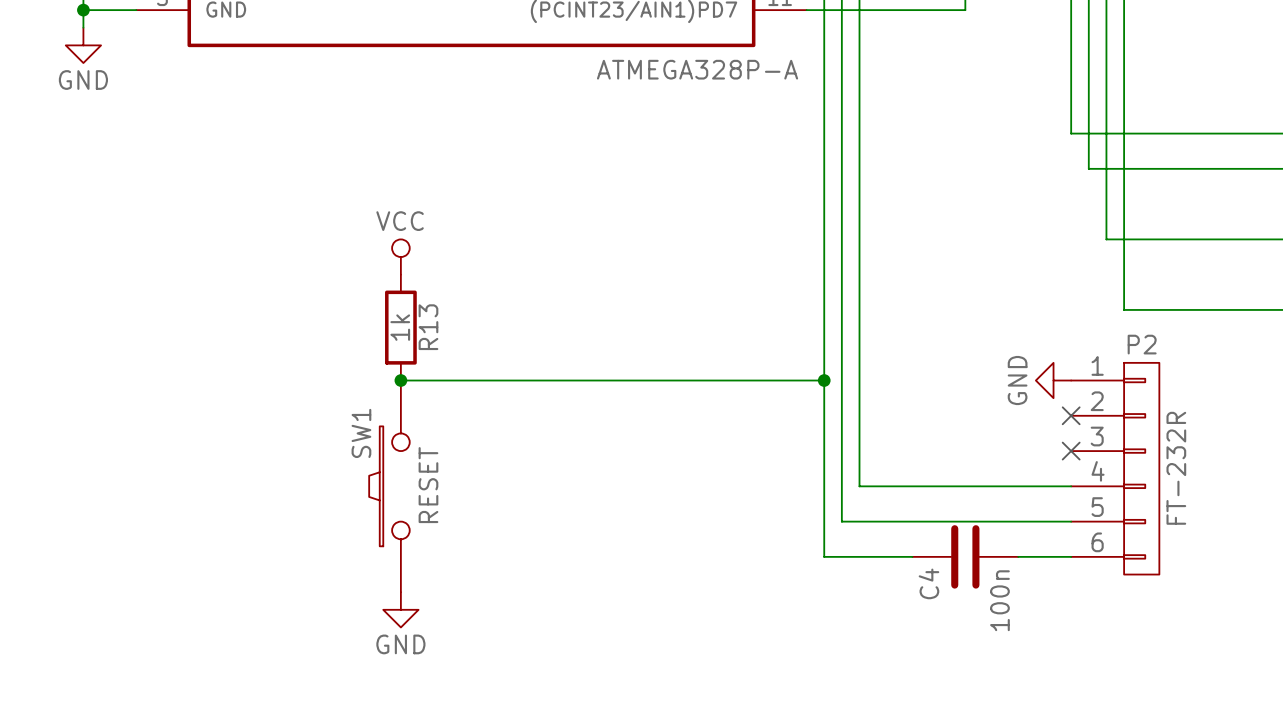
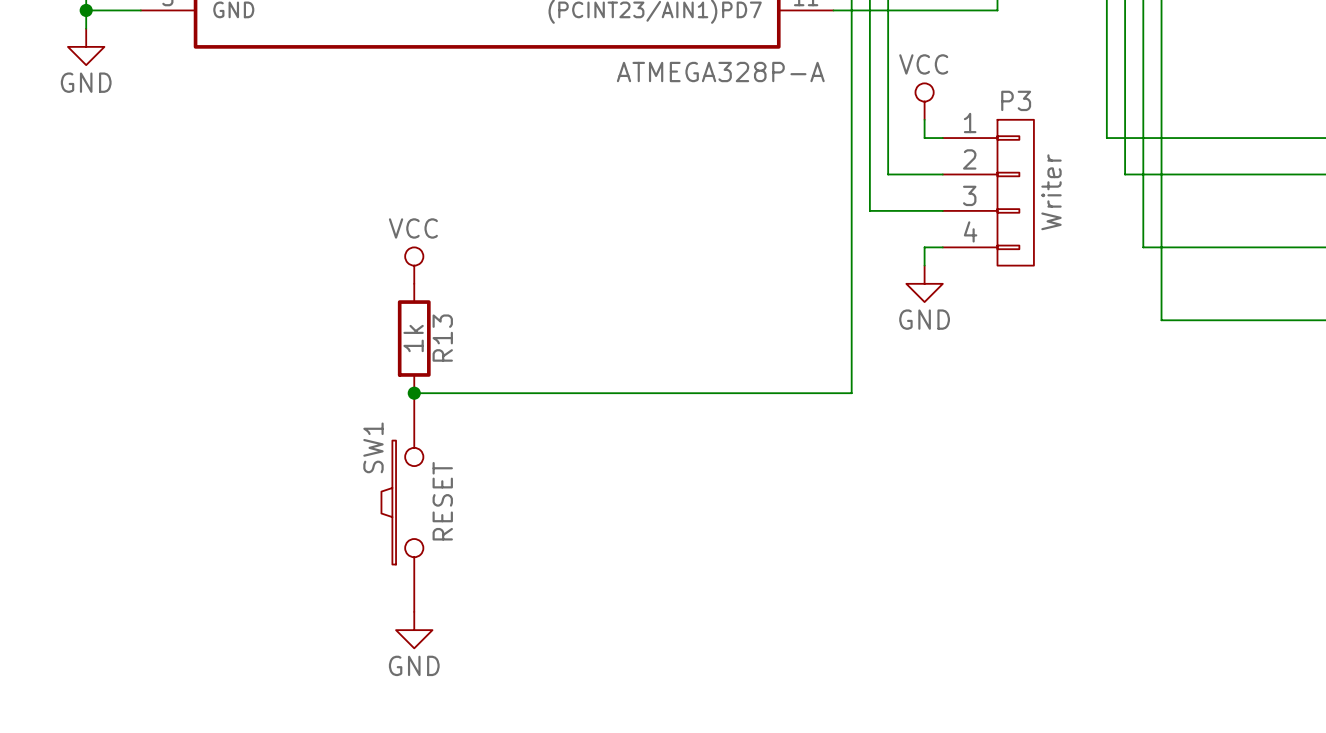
power symbol: none -> VCC (924, 101)
wire: none -> (924, 119) (924, 138) (942, 138)
wire: (859, 168) (859, 486) (1071, 486) -> (888, 174) (942, 174)
P3: none -> Writer (988, 192)
wire: (841, 204) (841, 521) (1071, 521) -> (869, 210) (942, 210)
wire: none -> (942, 247) (924, 247) (924, 265)
wire: (824, 380) (824, 556) (912, 556) -> none
junction: (824, 380) -> none
power symbol rotation: 0° (1053, 380) -> 90° counterclockwise (924, 283)
power symbol position: GND (1053, 380) -> GND (924, 283)
no-connect mark: (1071, 415) -> none
no-connect mark: (1071, 451) -> none
P2: FT-232R (1115, 468) -> none
C4: 100n (965, 556) -> none
wire: (1018, 556) (1071, 556) -> none

